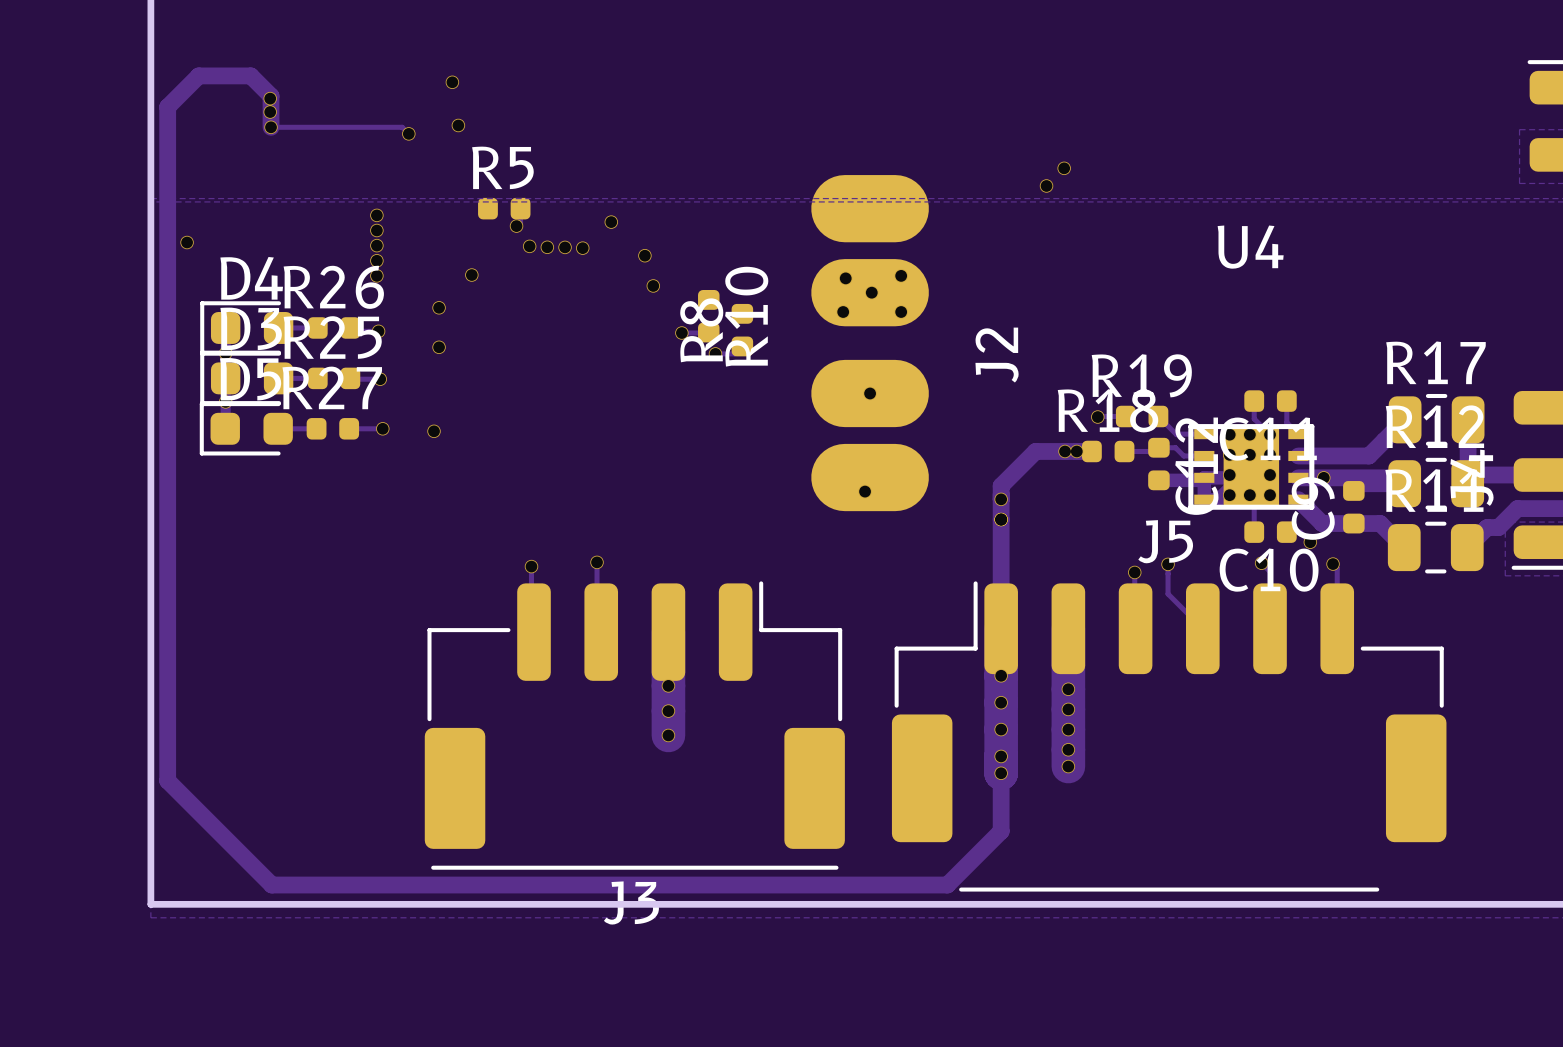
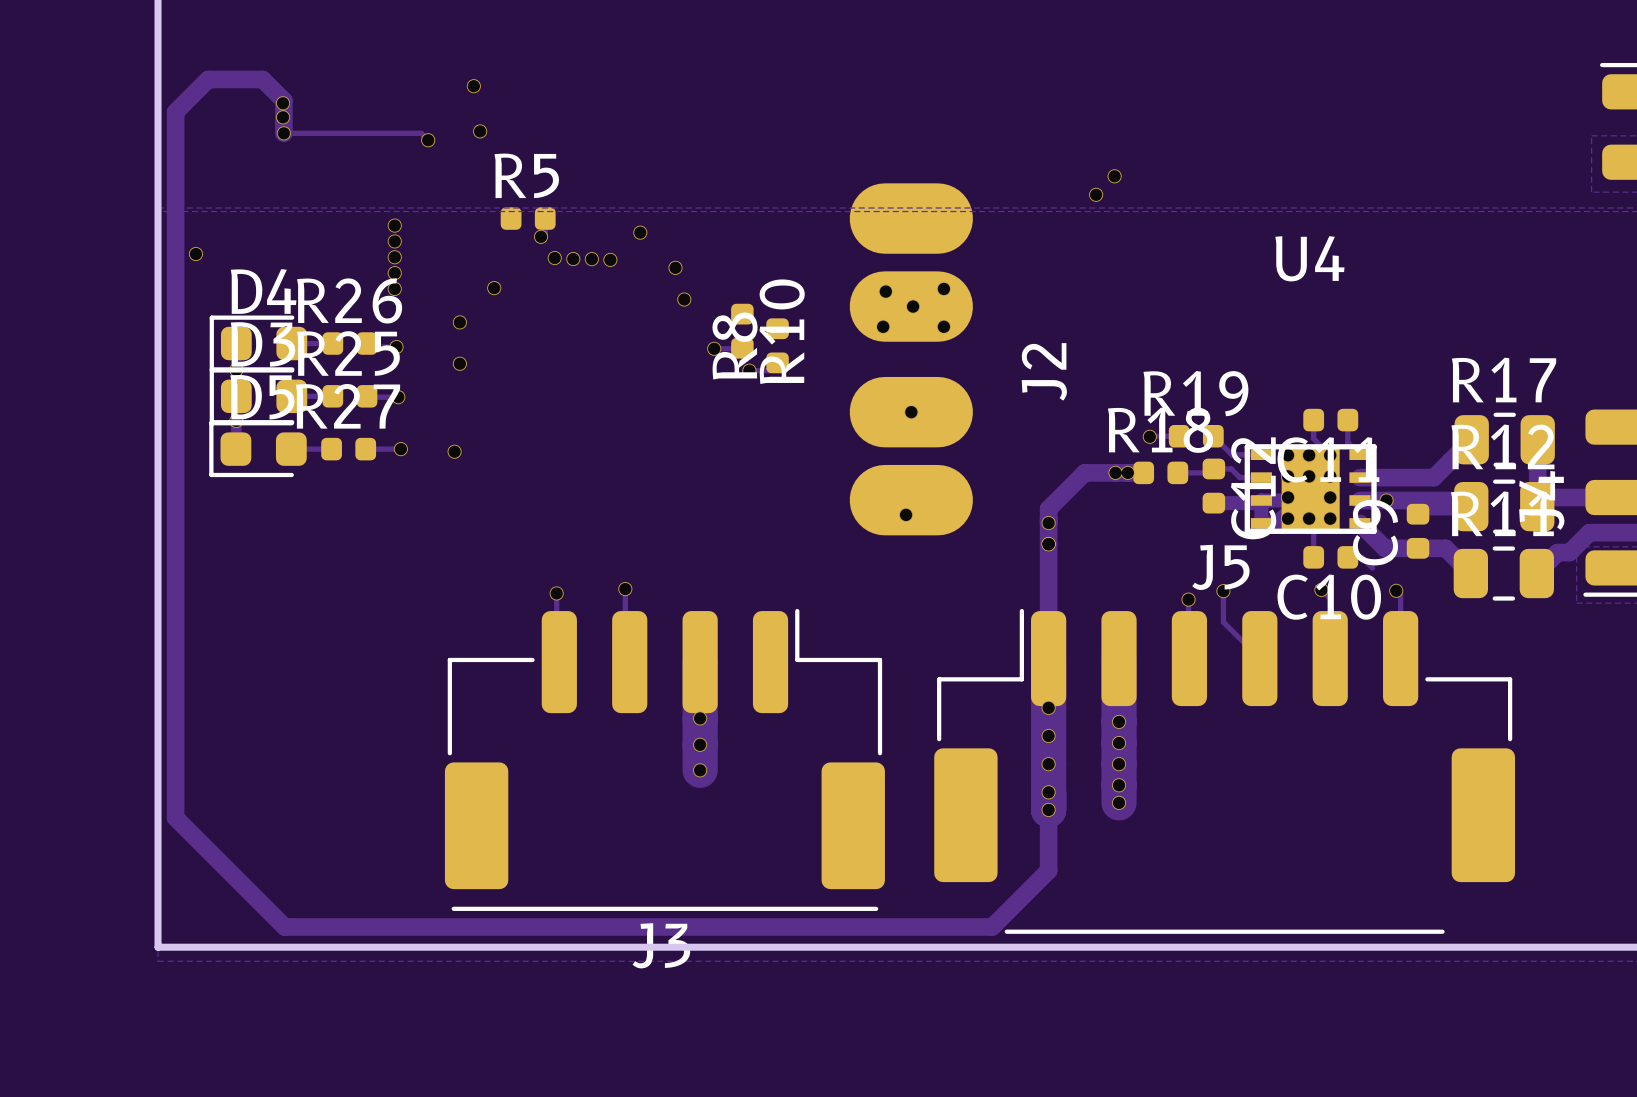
via: (1310, 542) -> none

